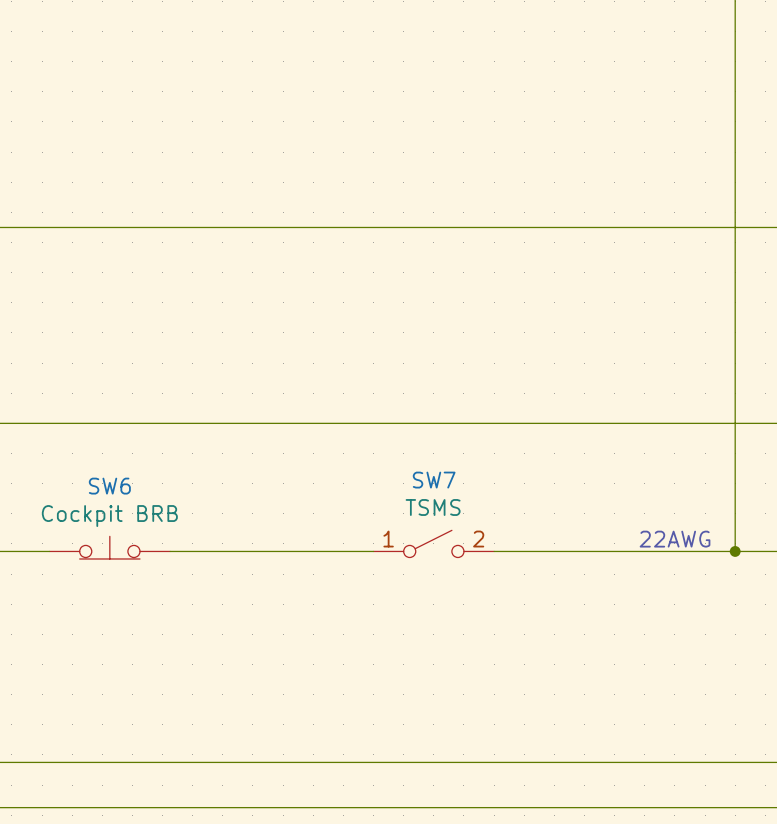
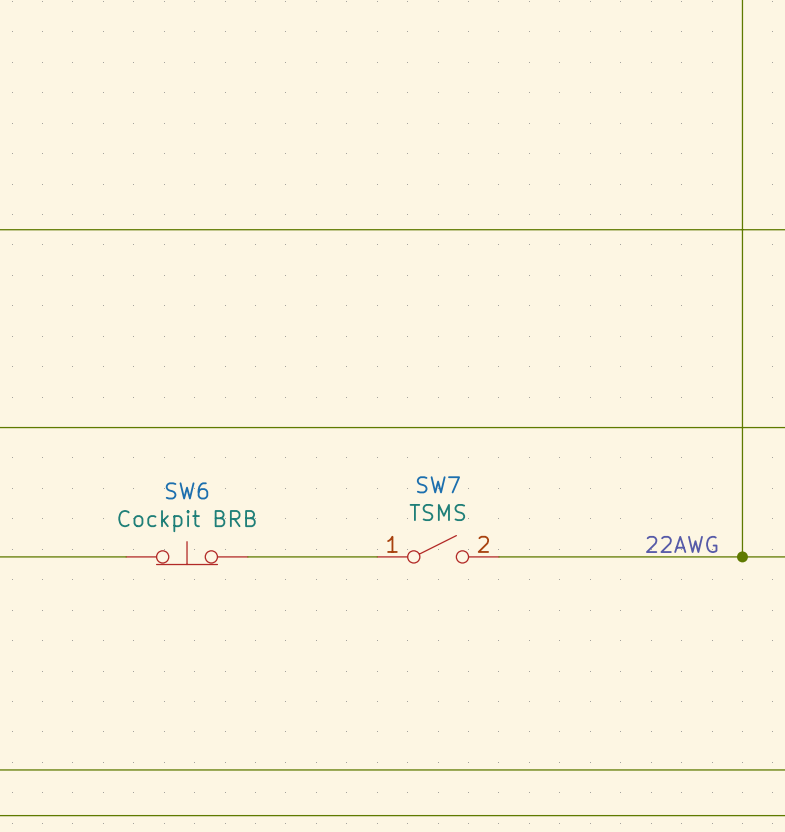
SW6 position: (109, 547) -> (187, 553)
wire: (170, 551) (245, 551) -> (50, 556) (126, 556)

